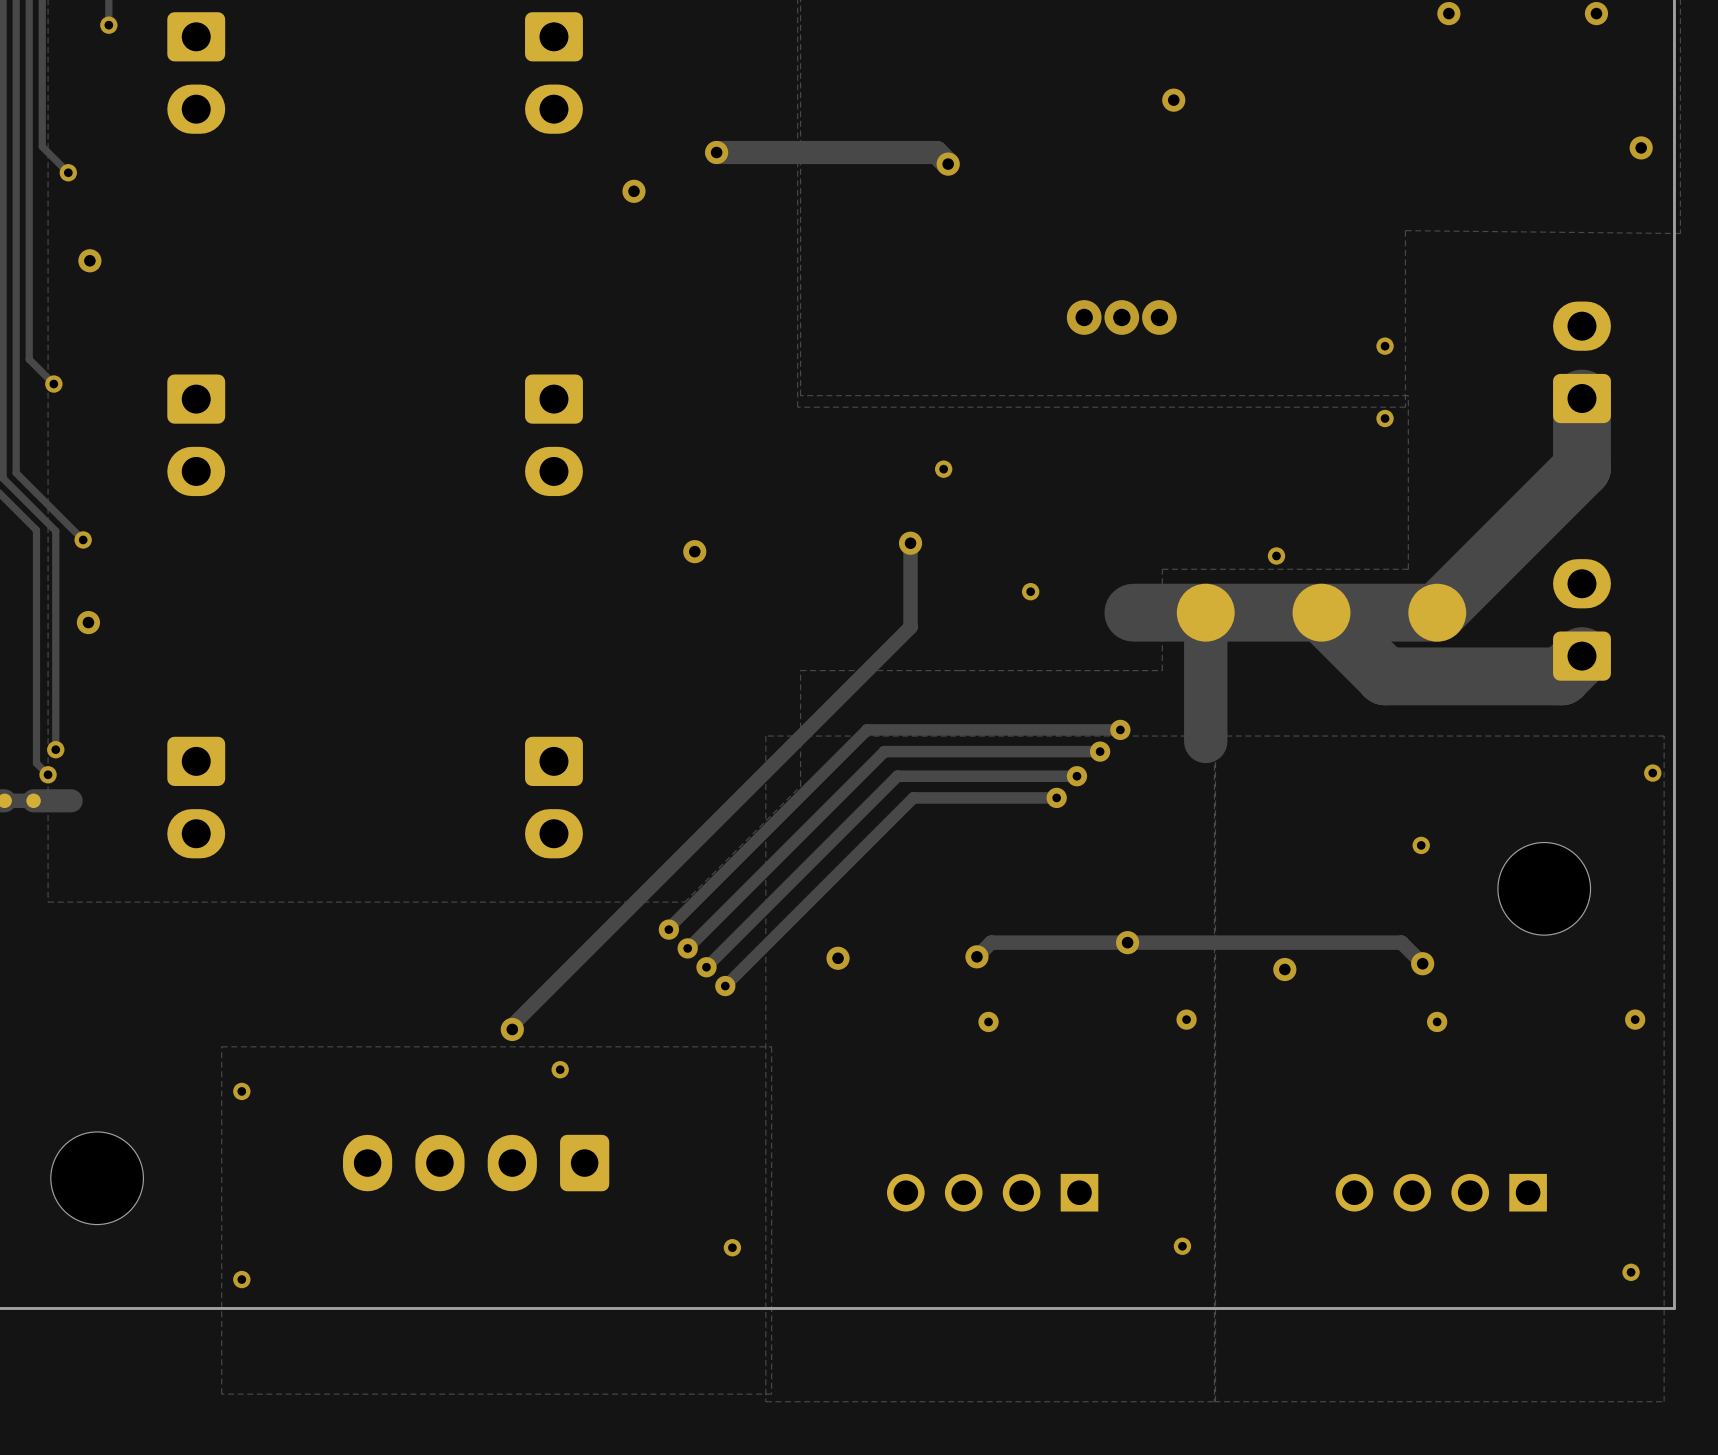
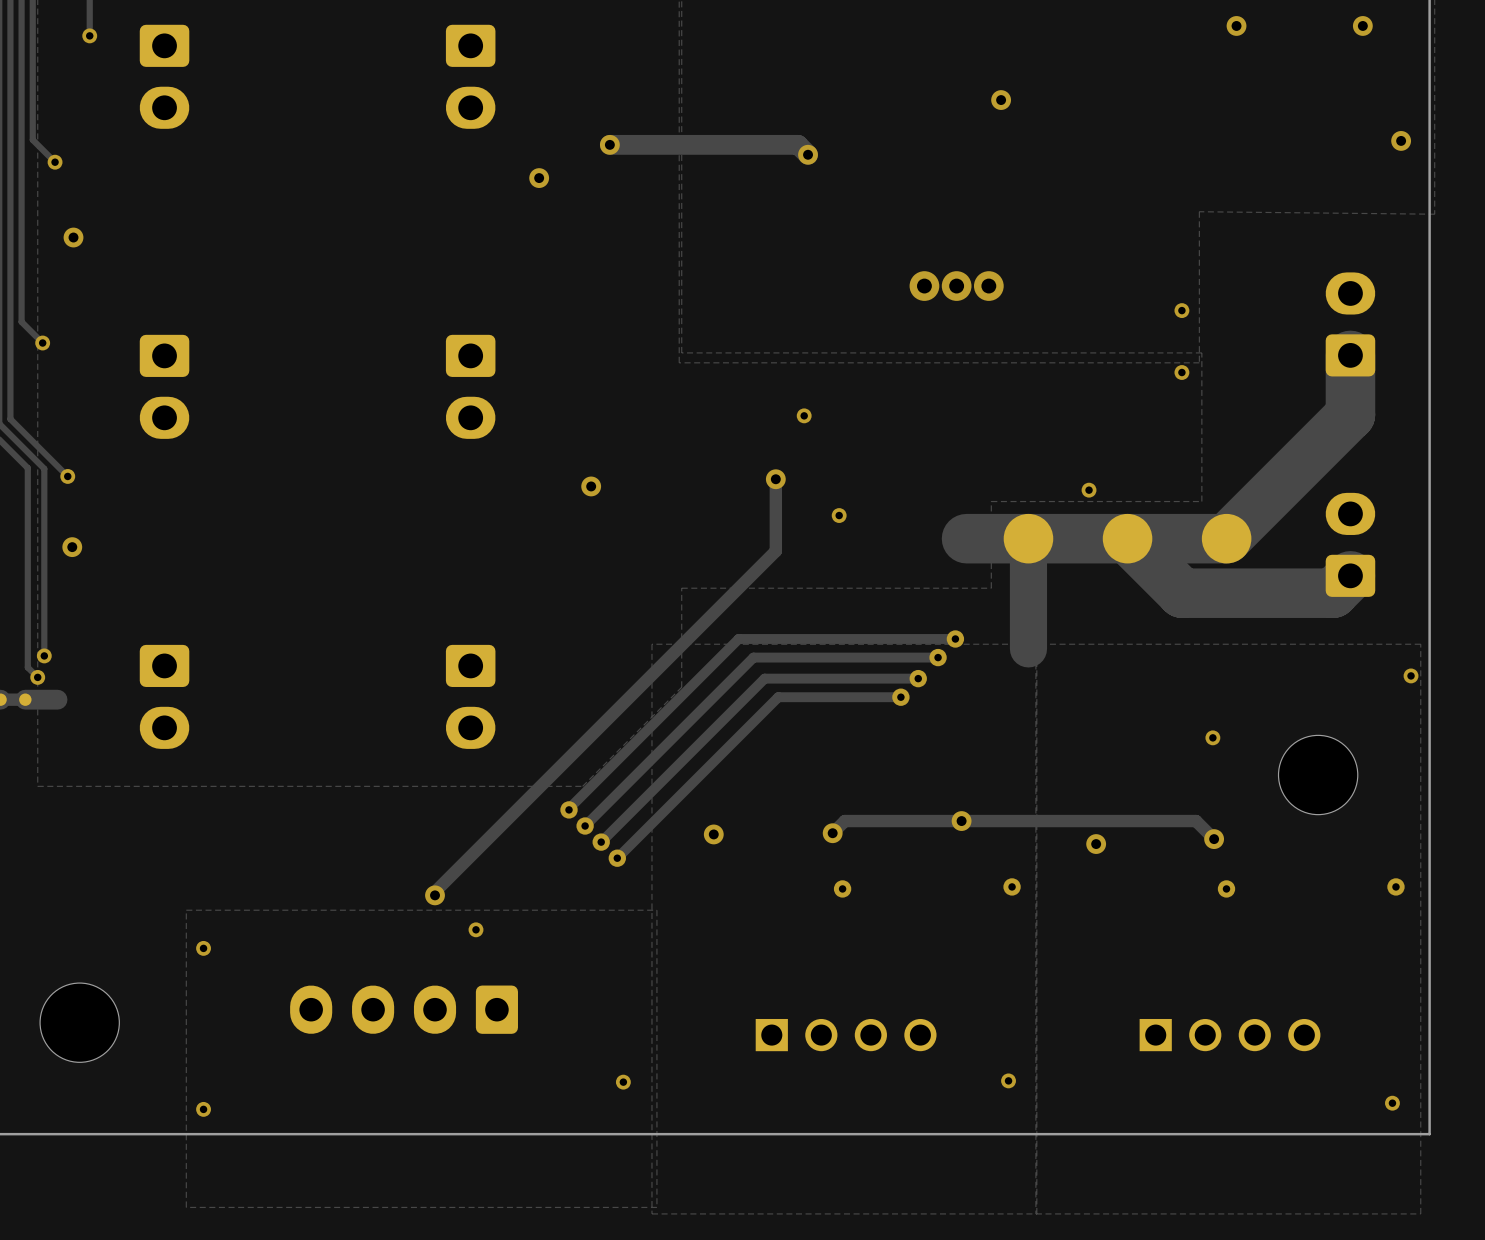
via position: (1030, 591) -> (839, 515)
part rotation: 0° (992, 1192) -> 180° (846, 1035)
part rotation: 0° (1441, 1192) -> 180° (1230, 1035)

